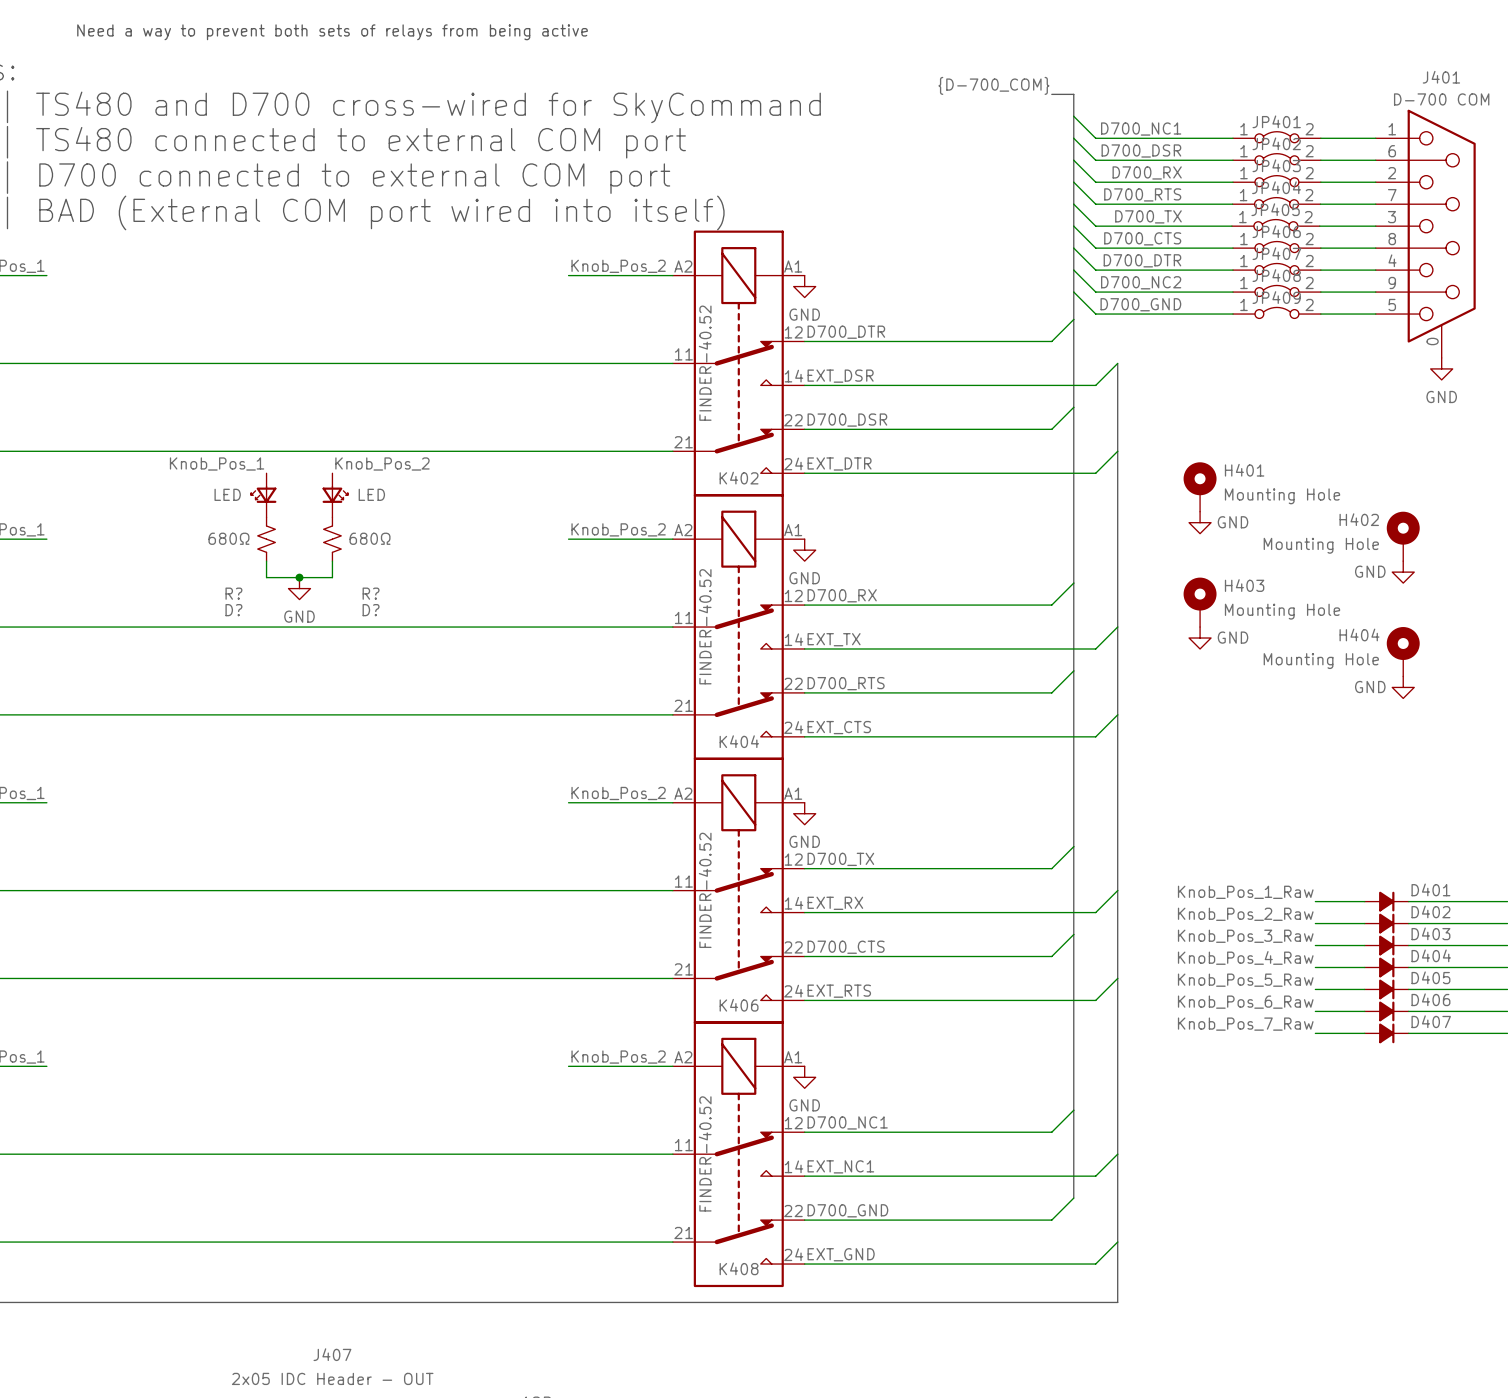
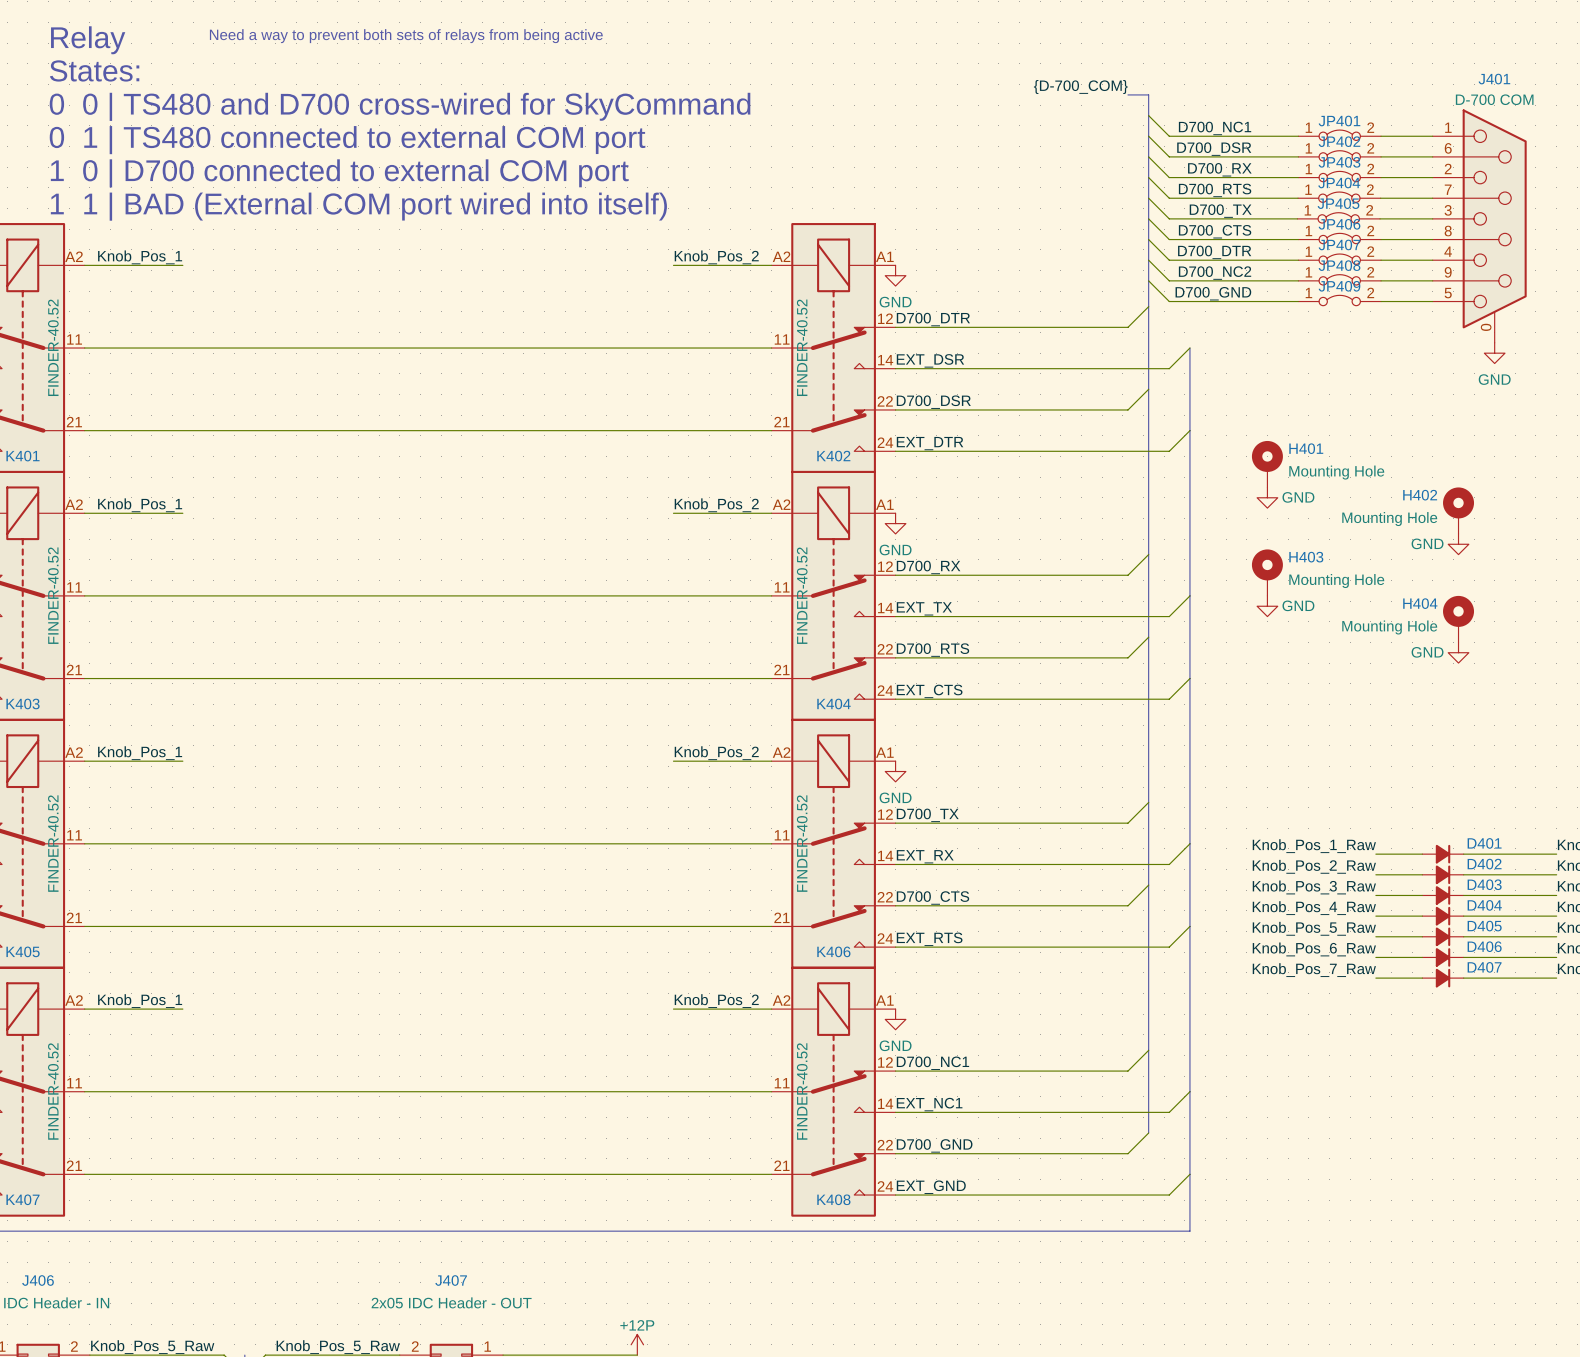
label: Knob_Pos_1 (217, 463) -> none
label: Knob_Pos_2 (382, 463) -> none
D?: LED (263, 495) -> none
D?: LED (335, 495) -> none
R?: 680Ω (266, 539) -> none
R?: 680Ω (332, 539) -> none
wire: (266, 561) (266, 577) (332, 577) (332, 561) -> none
junction: (299, 577) -> none
power symbol: GND (299, 588) -> none

